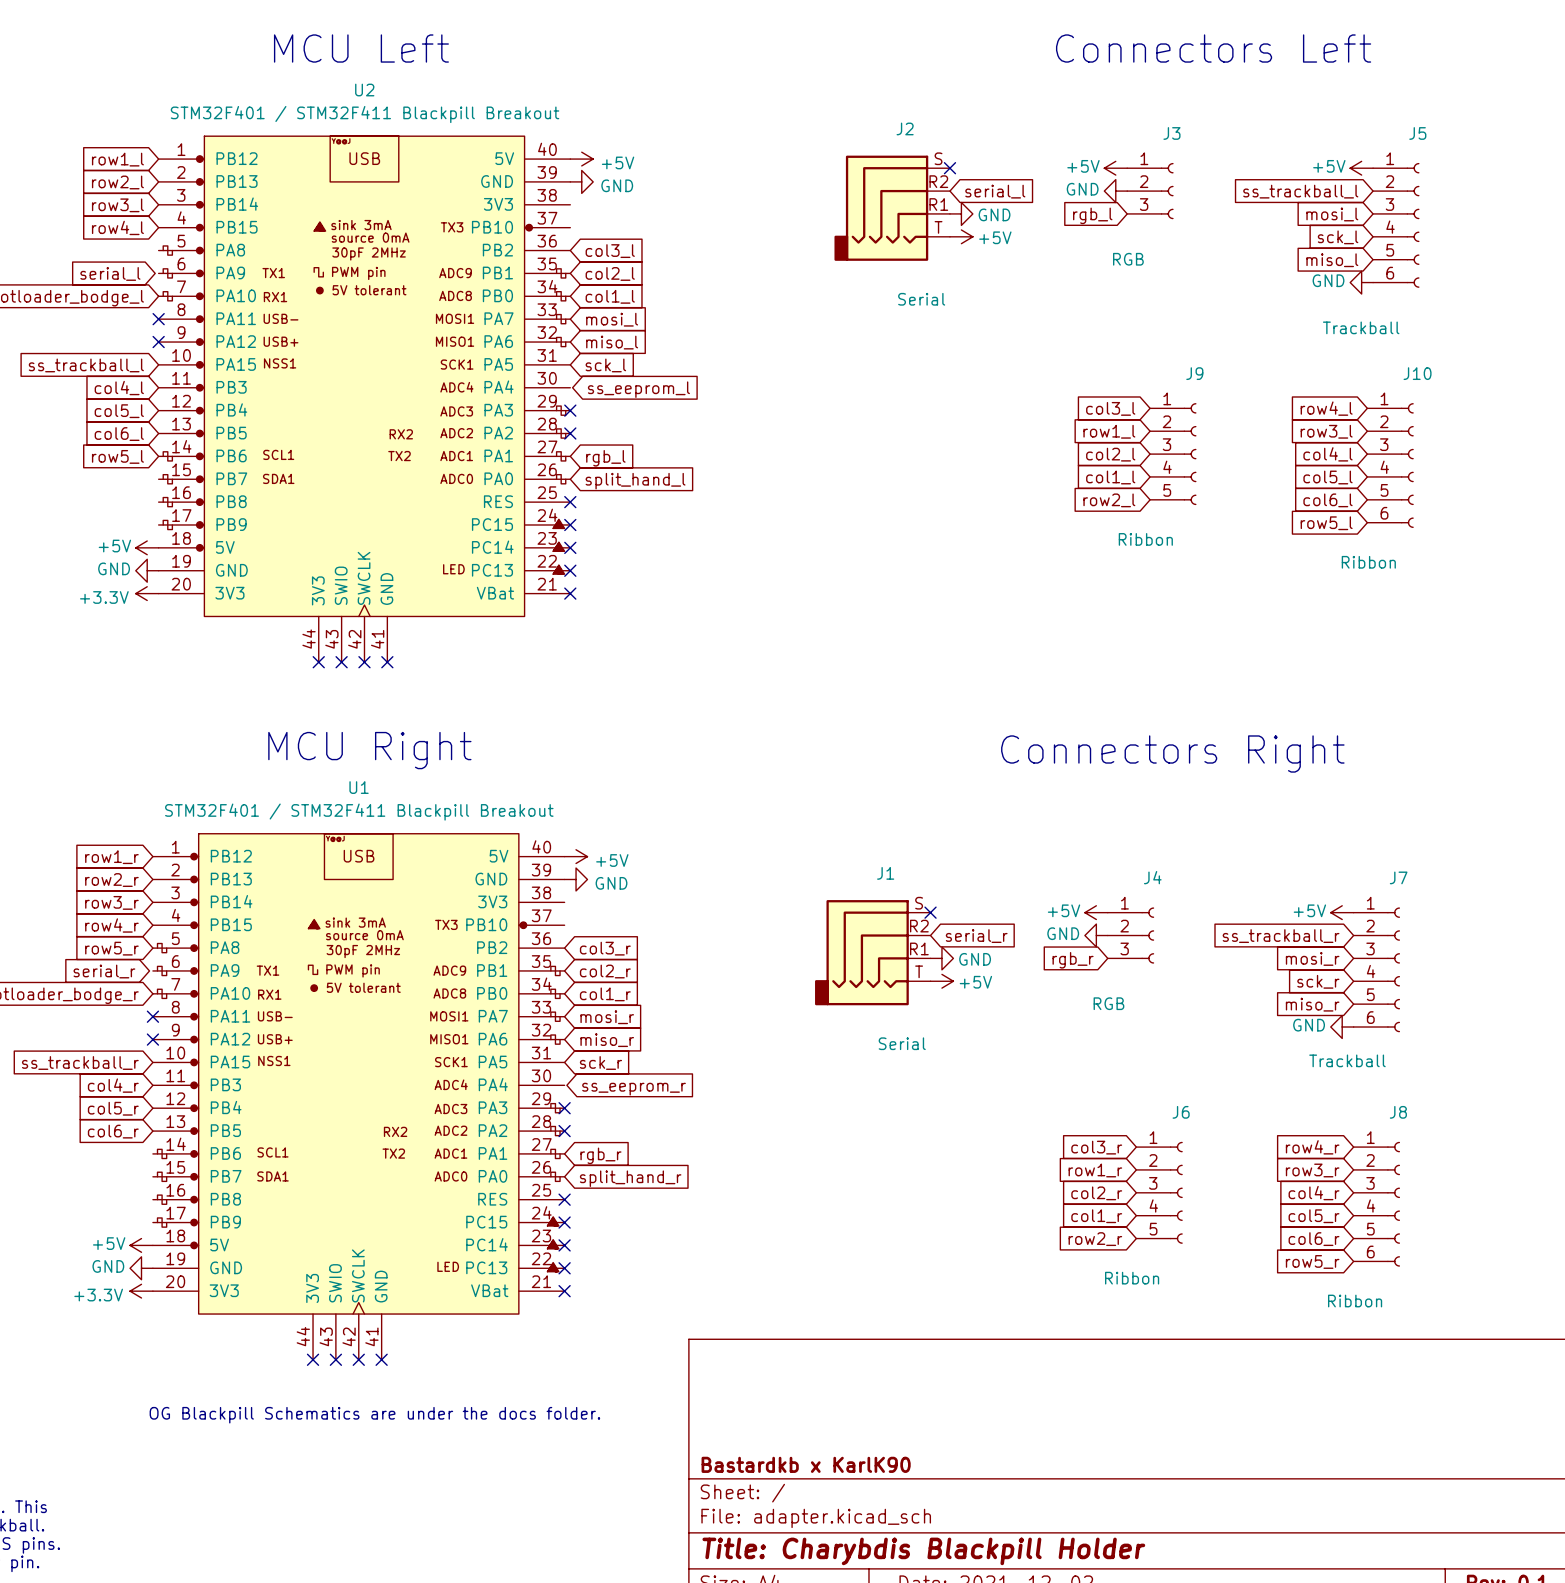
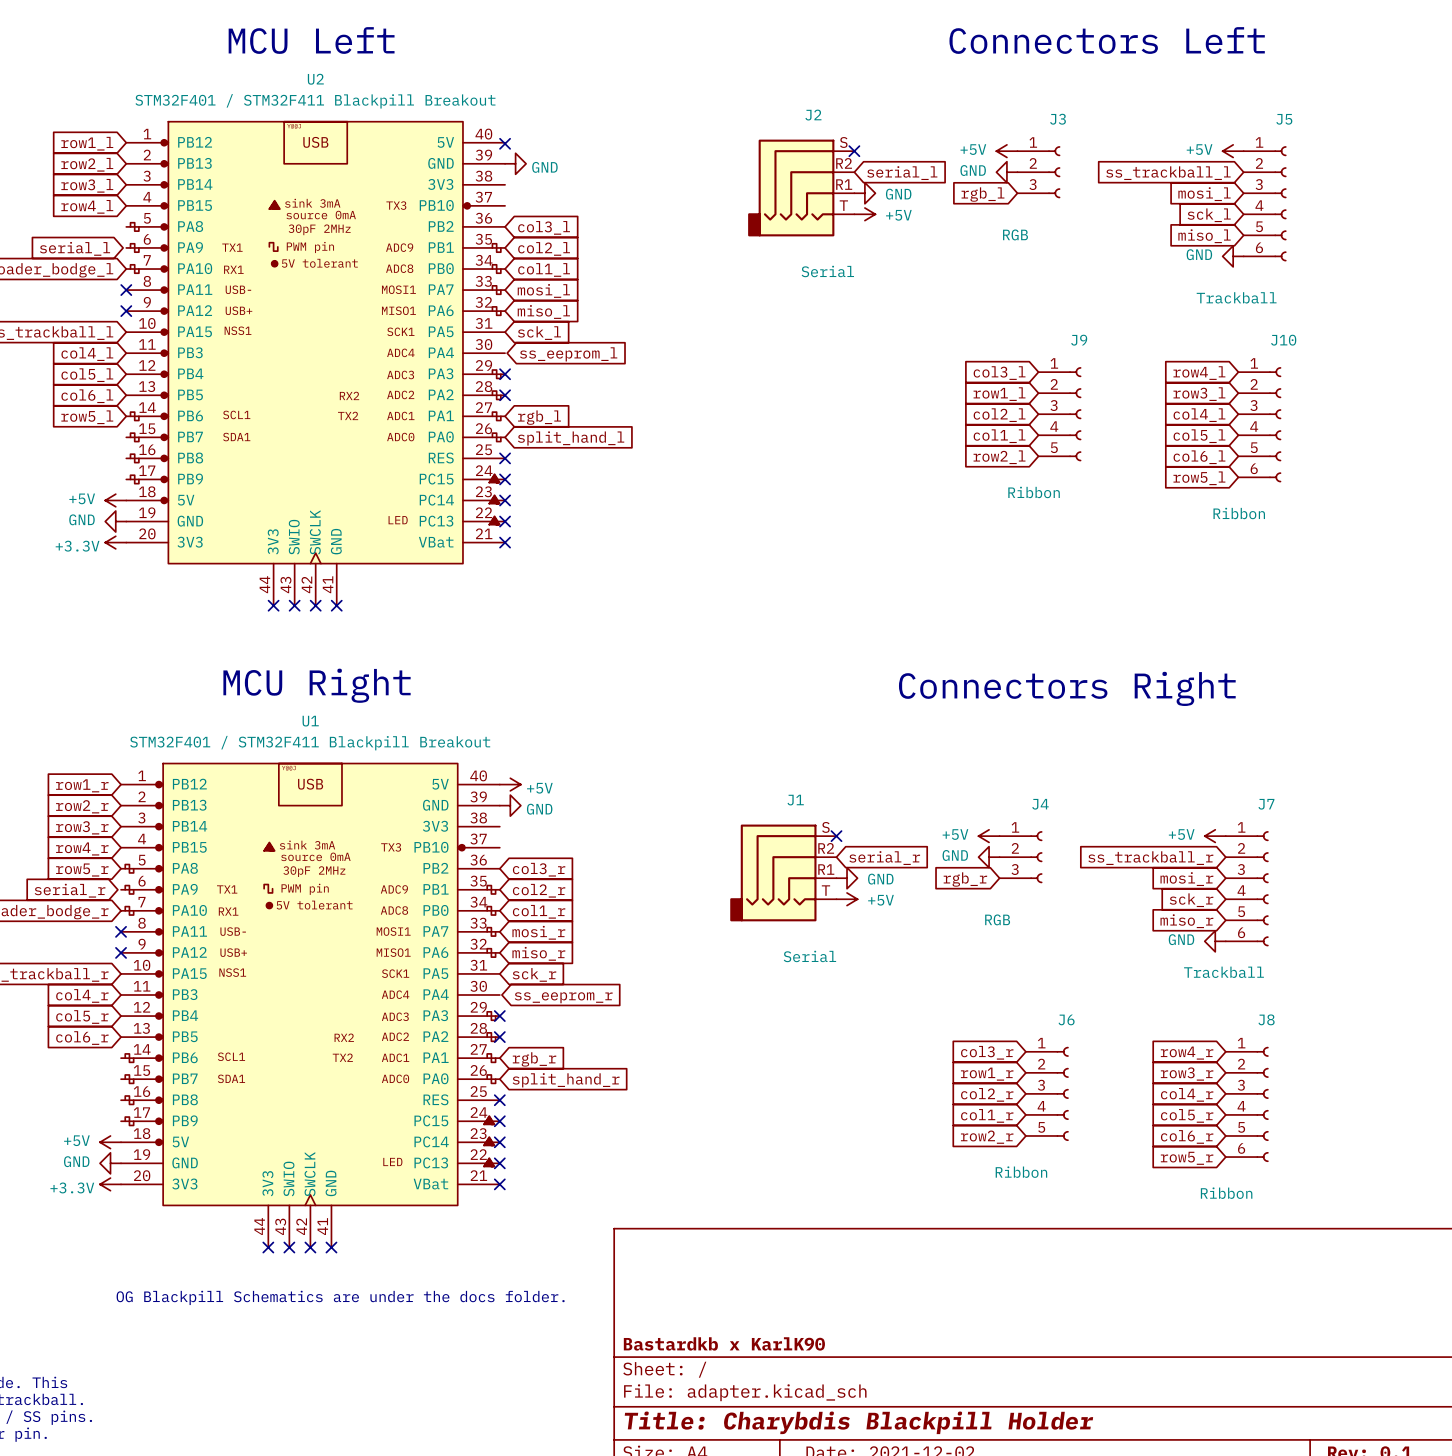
power symbol: +5V (581, 159) -> none
no-connect mark: none -> (505, 143)

